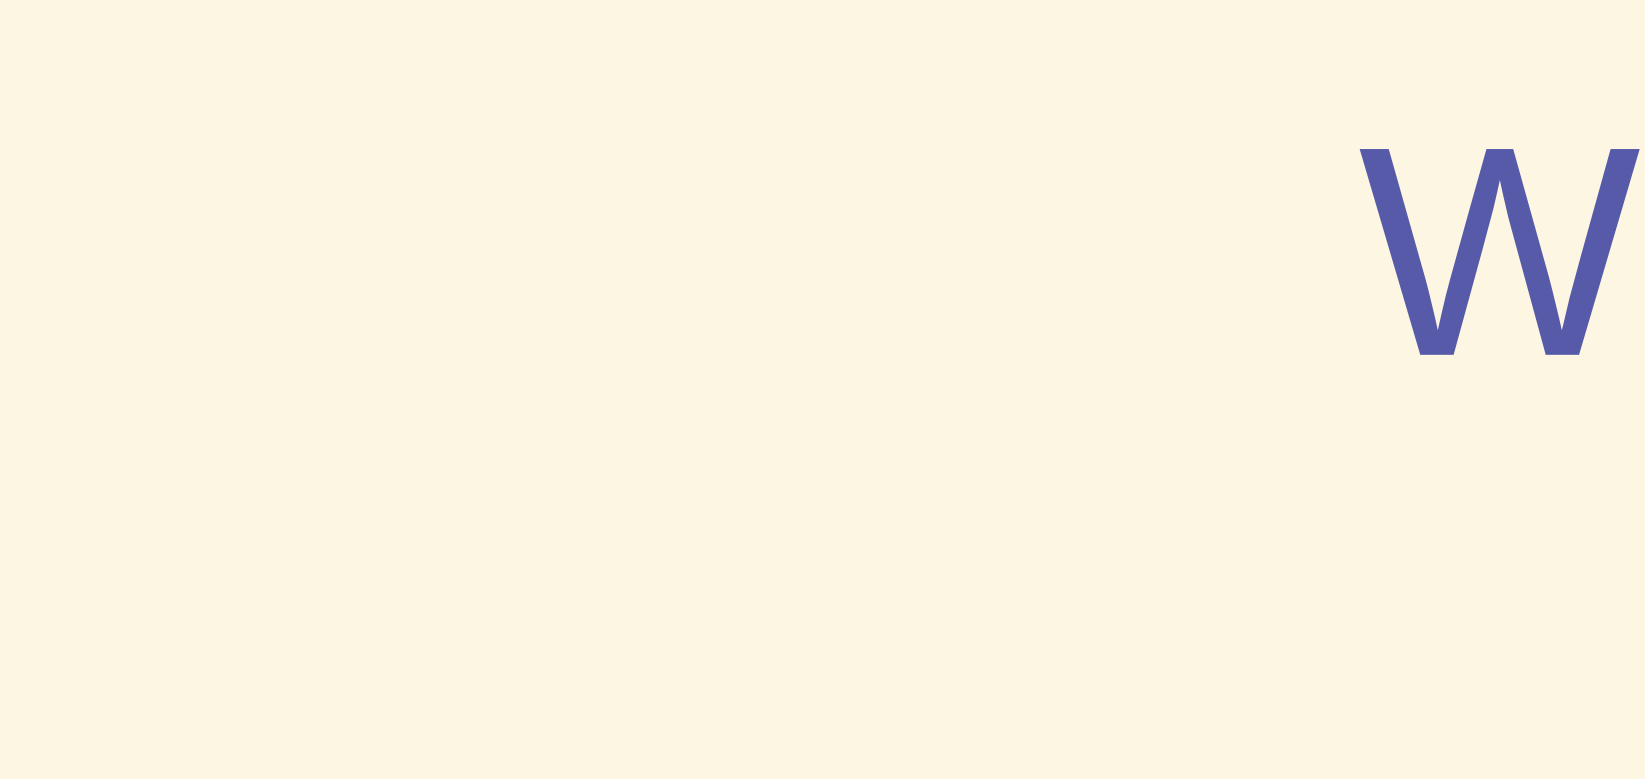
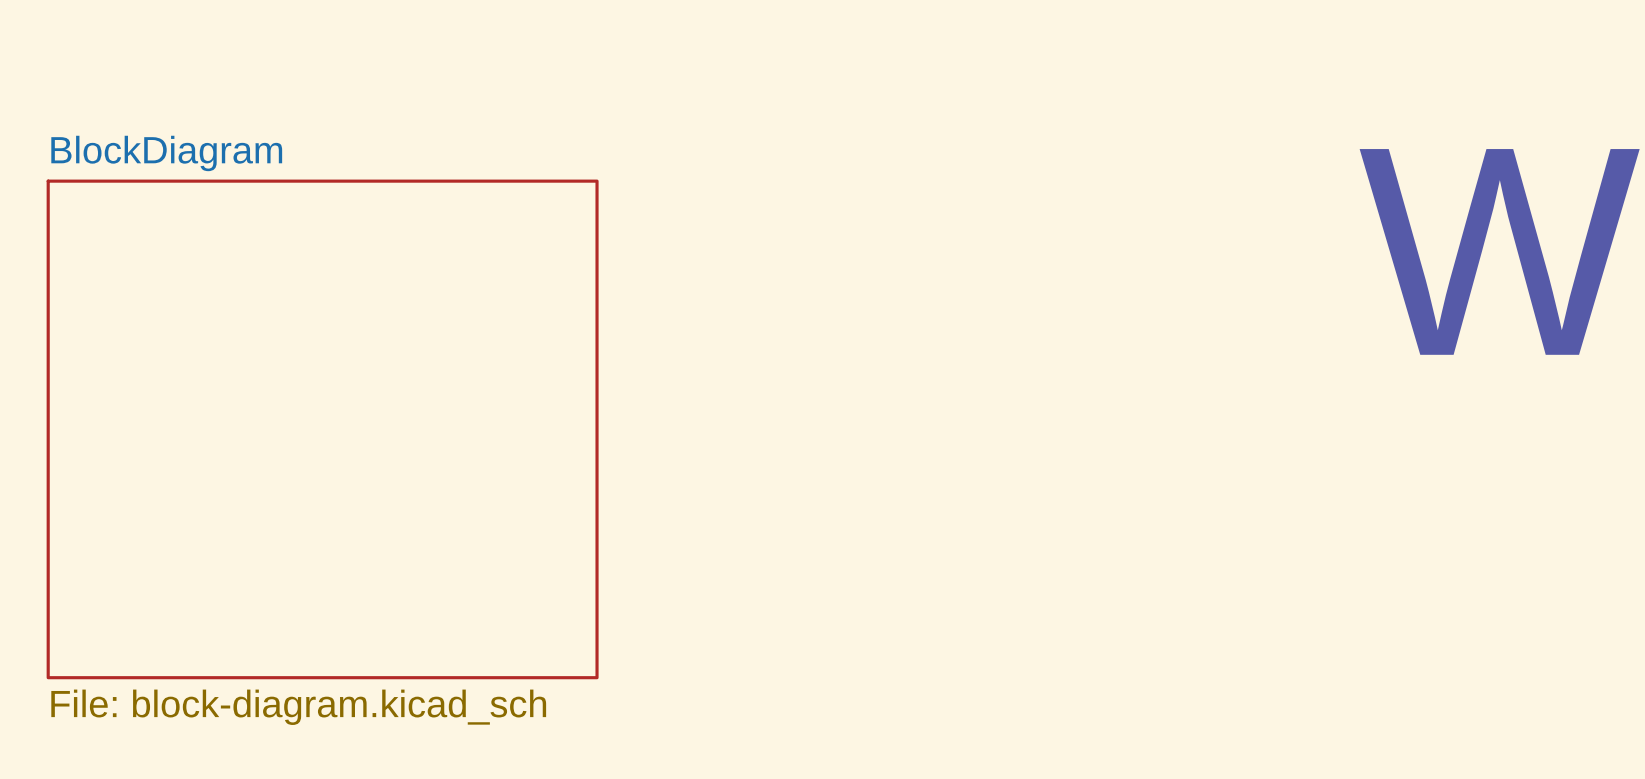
sheet BlockDiagram: none -> File: block-diagram.kicad_sch (322, 429)

